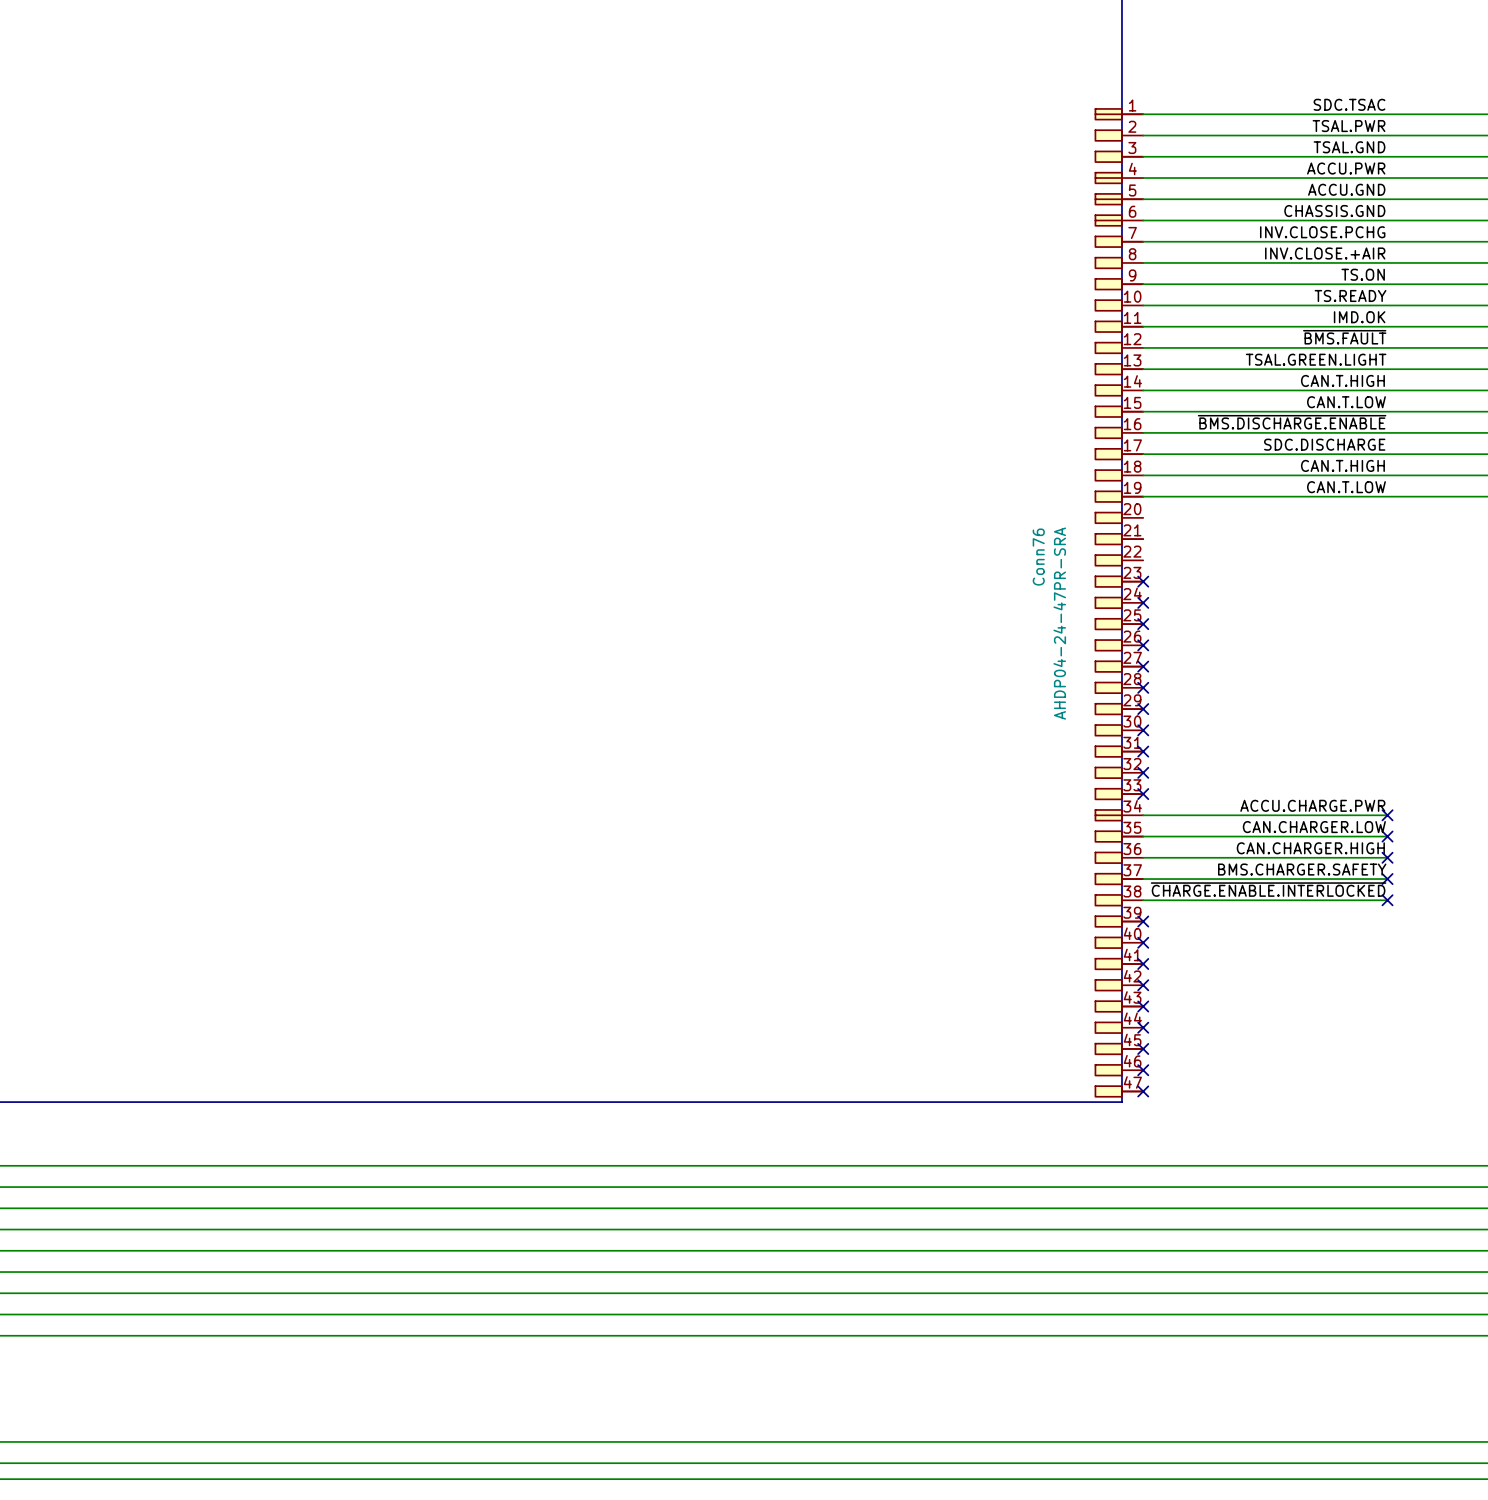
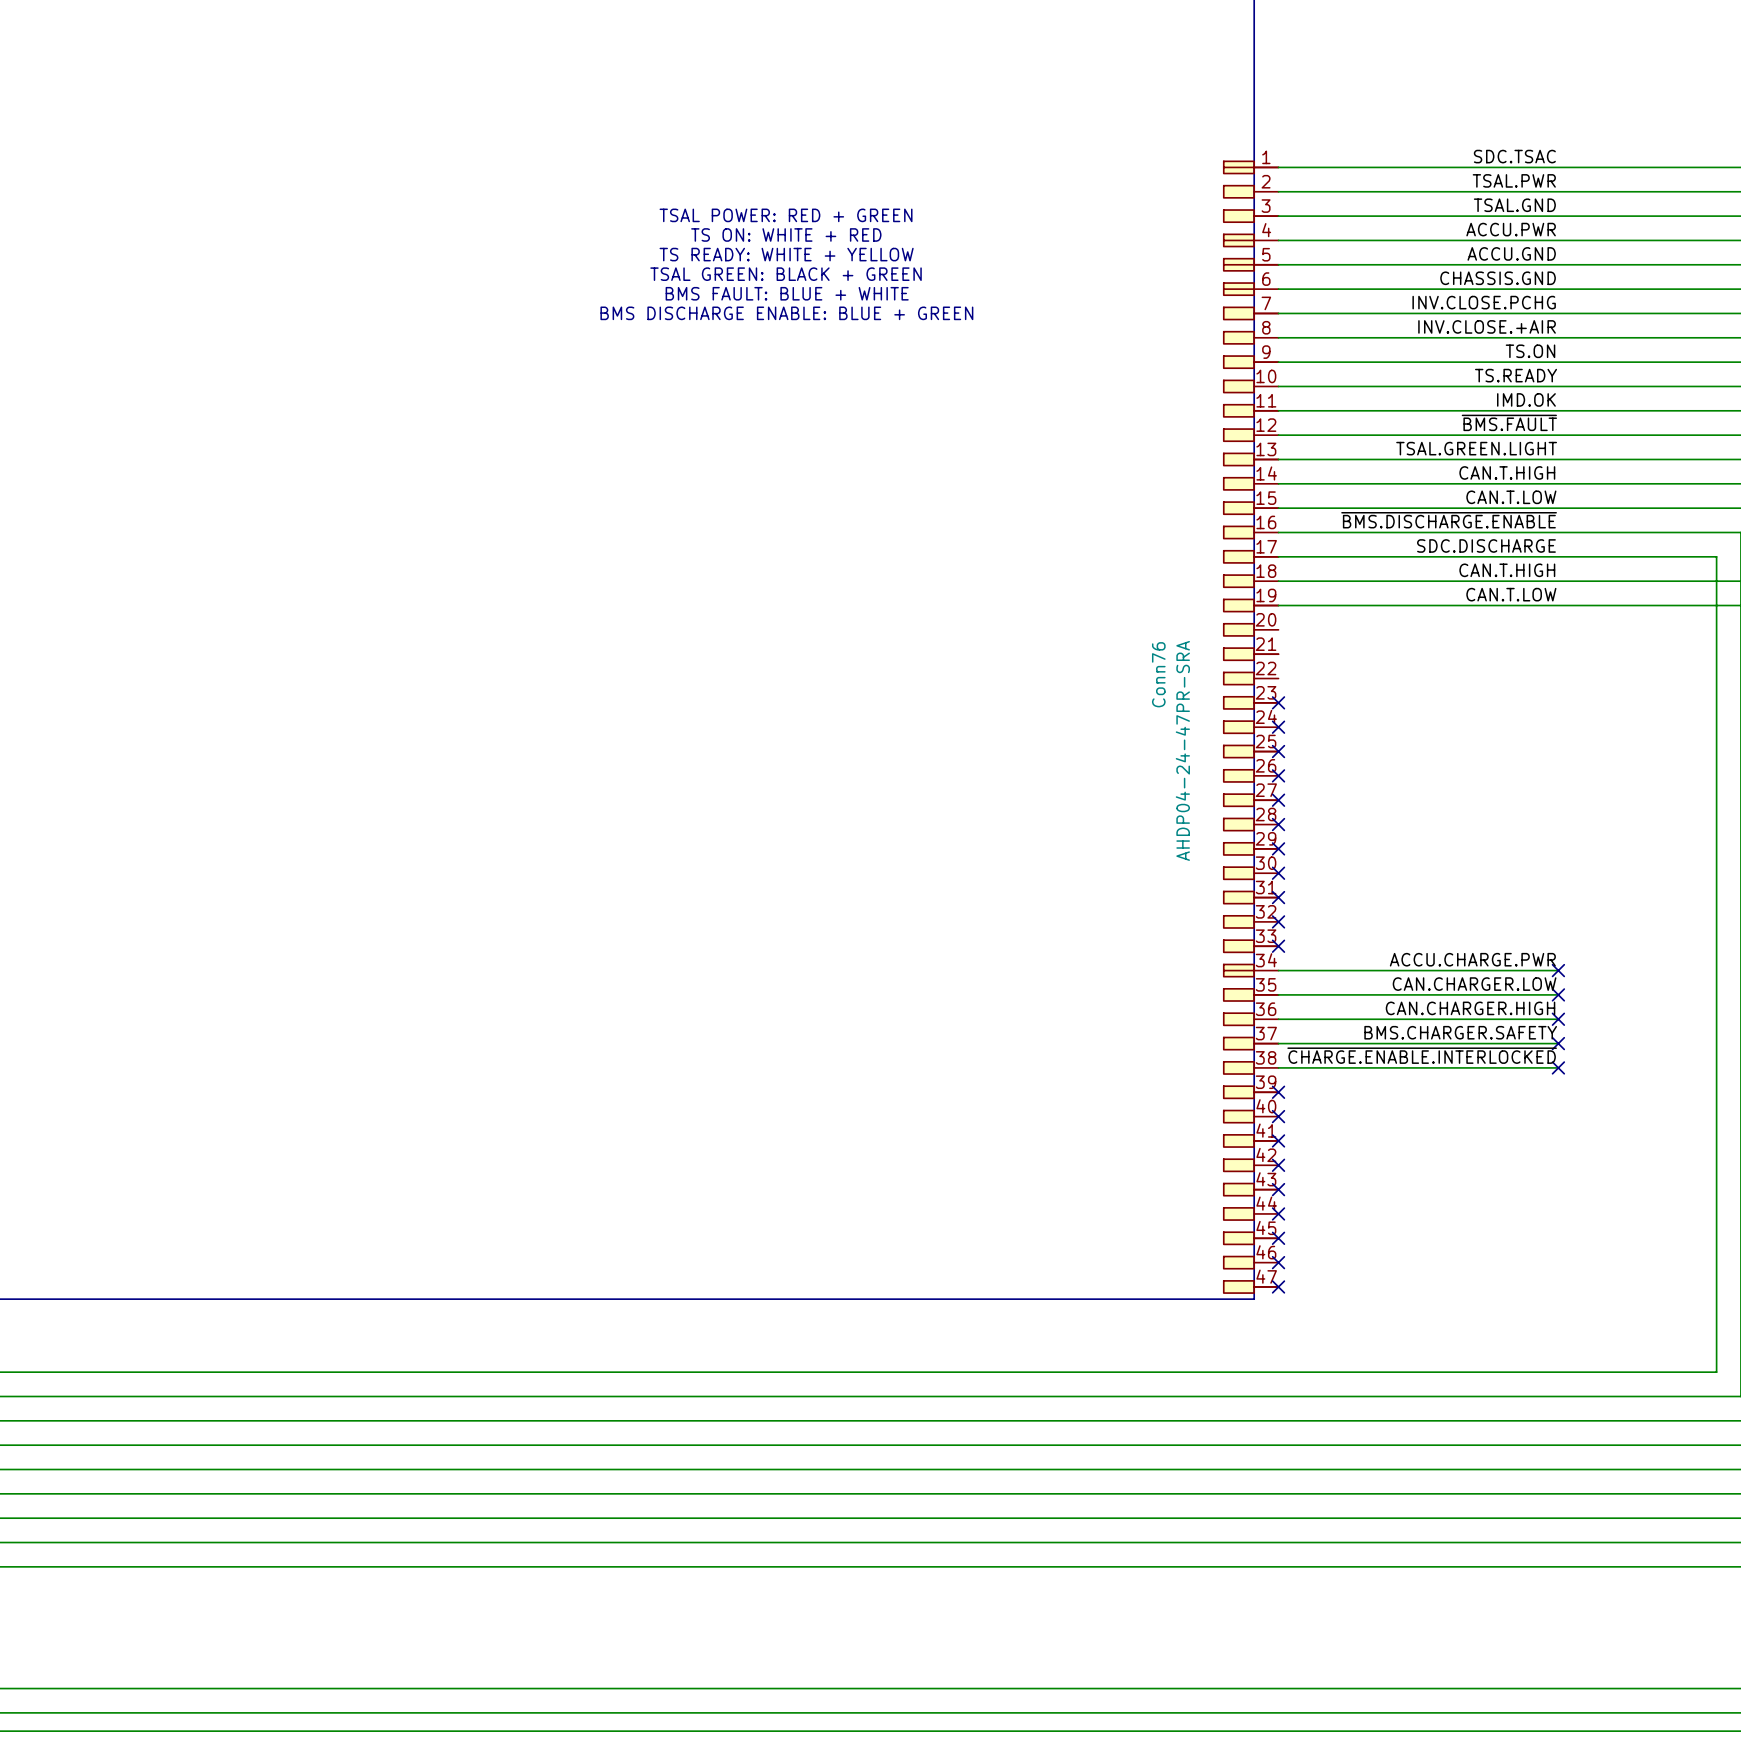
text: none -> TSAL POWER: RED + GREEN (786, 215)
text: none -> TS ON: WHITE + RED (786, 234)
text: none -> TS READY: WHITE + YELLOW (786, 254)
text: none -> TSAL GREEN: BLACK + GREEN (786, 274)
text: none -> BMS FAULT: BLUE + WHITE (787, 293)
text: none -> BMS DISCHARGE ENABLE: BLUE + GREEN (786, 313)

